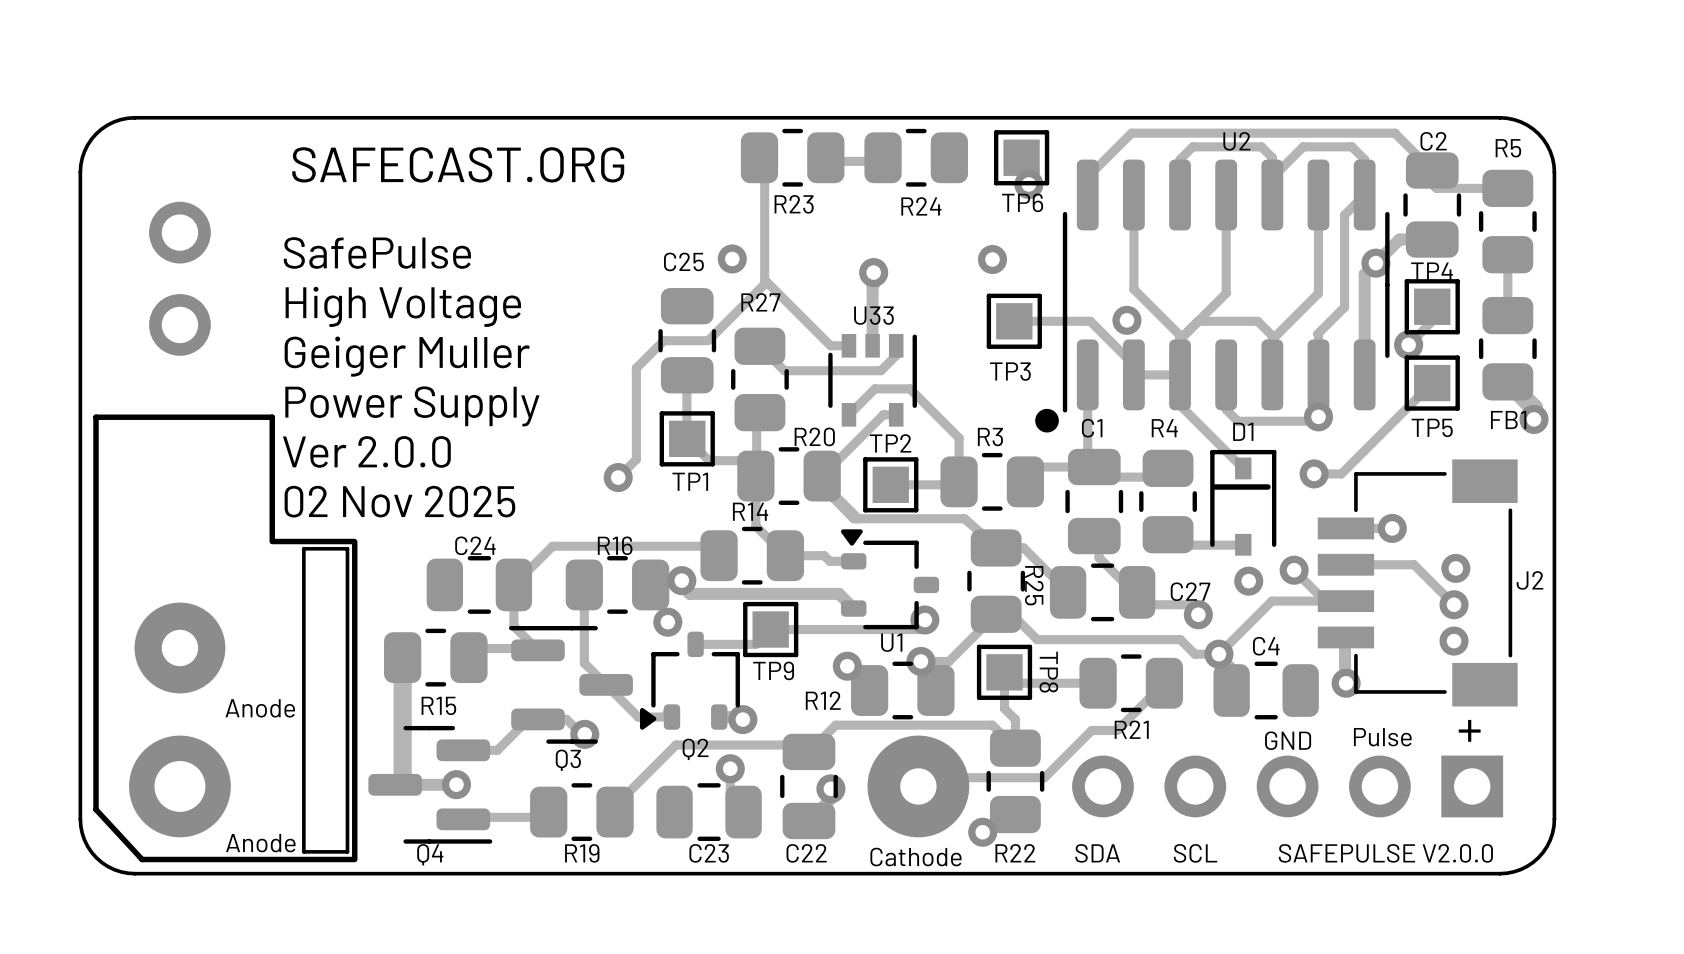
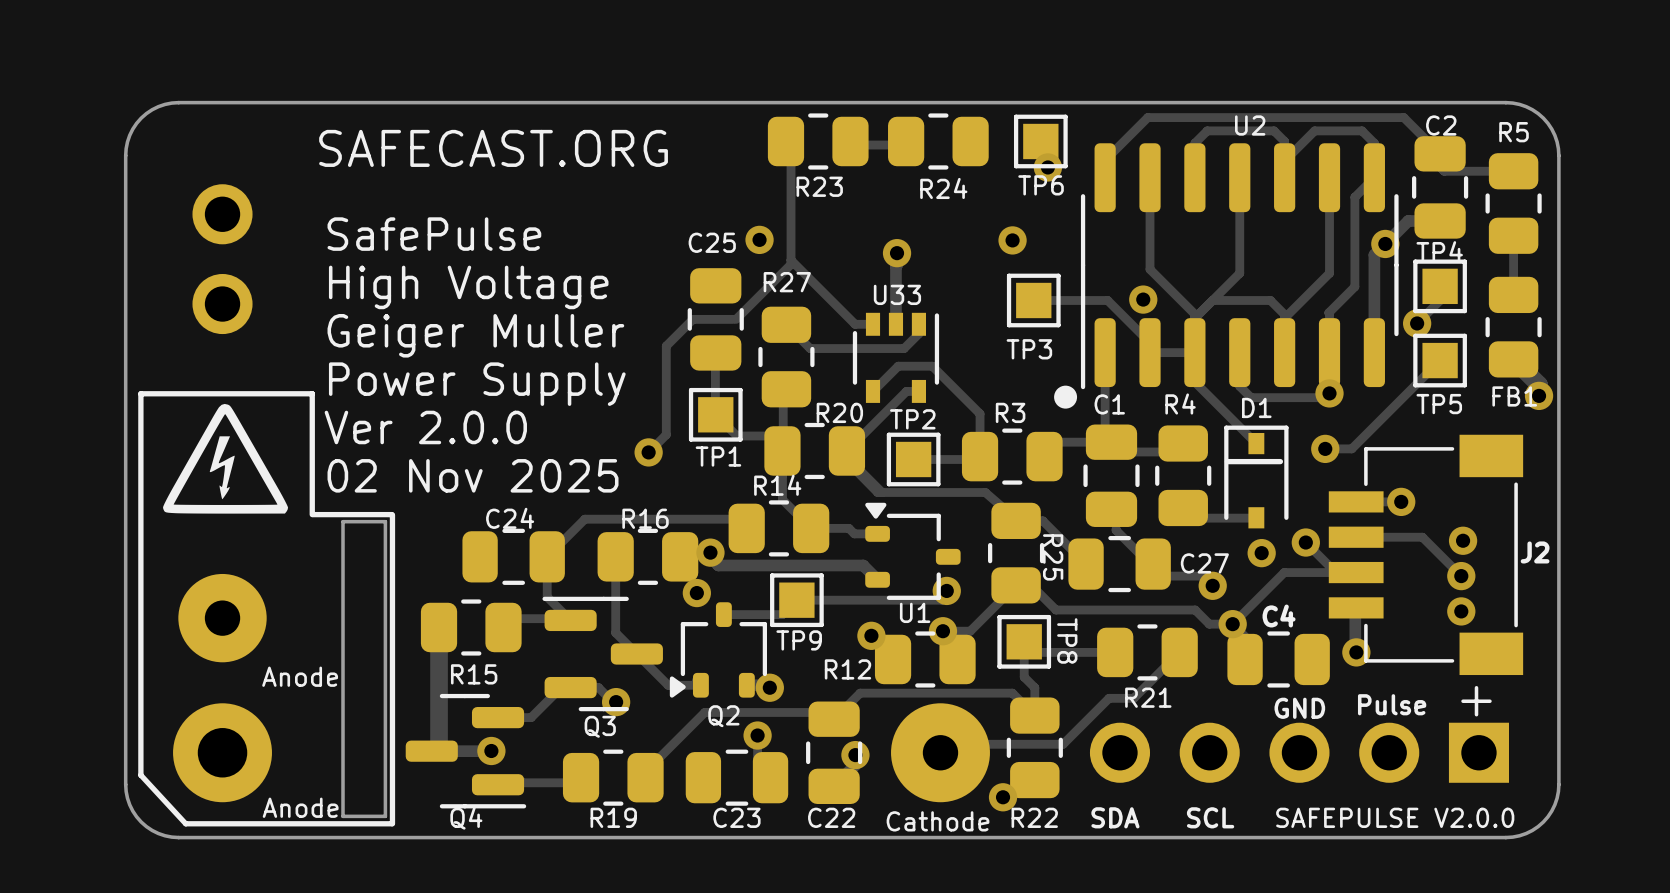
drawing: none -> [163, 403, 289, 514]

